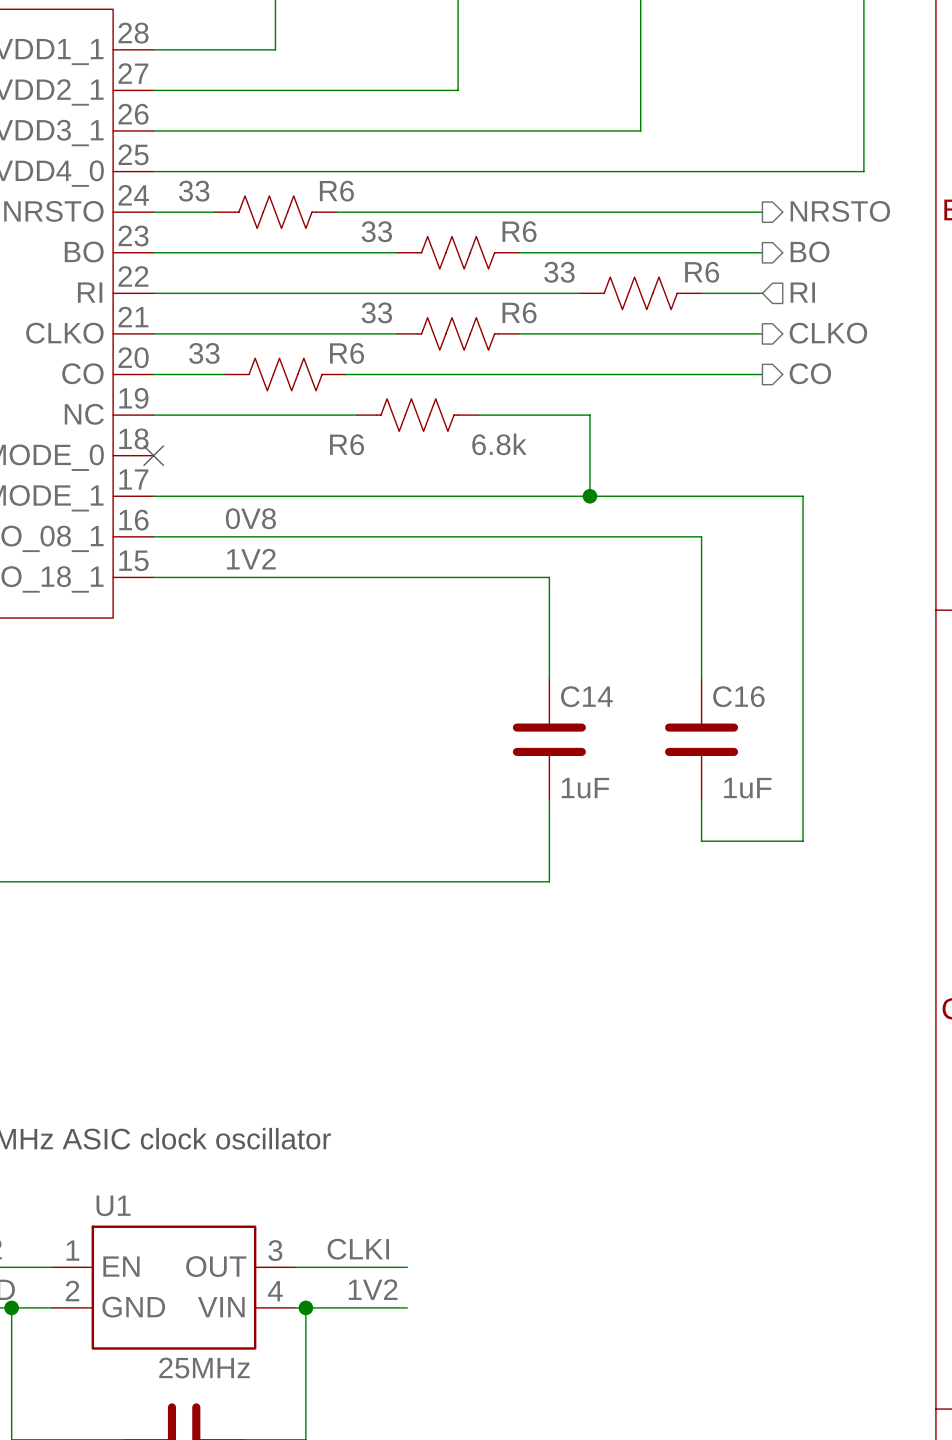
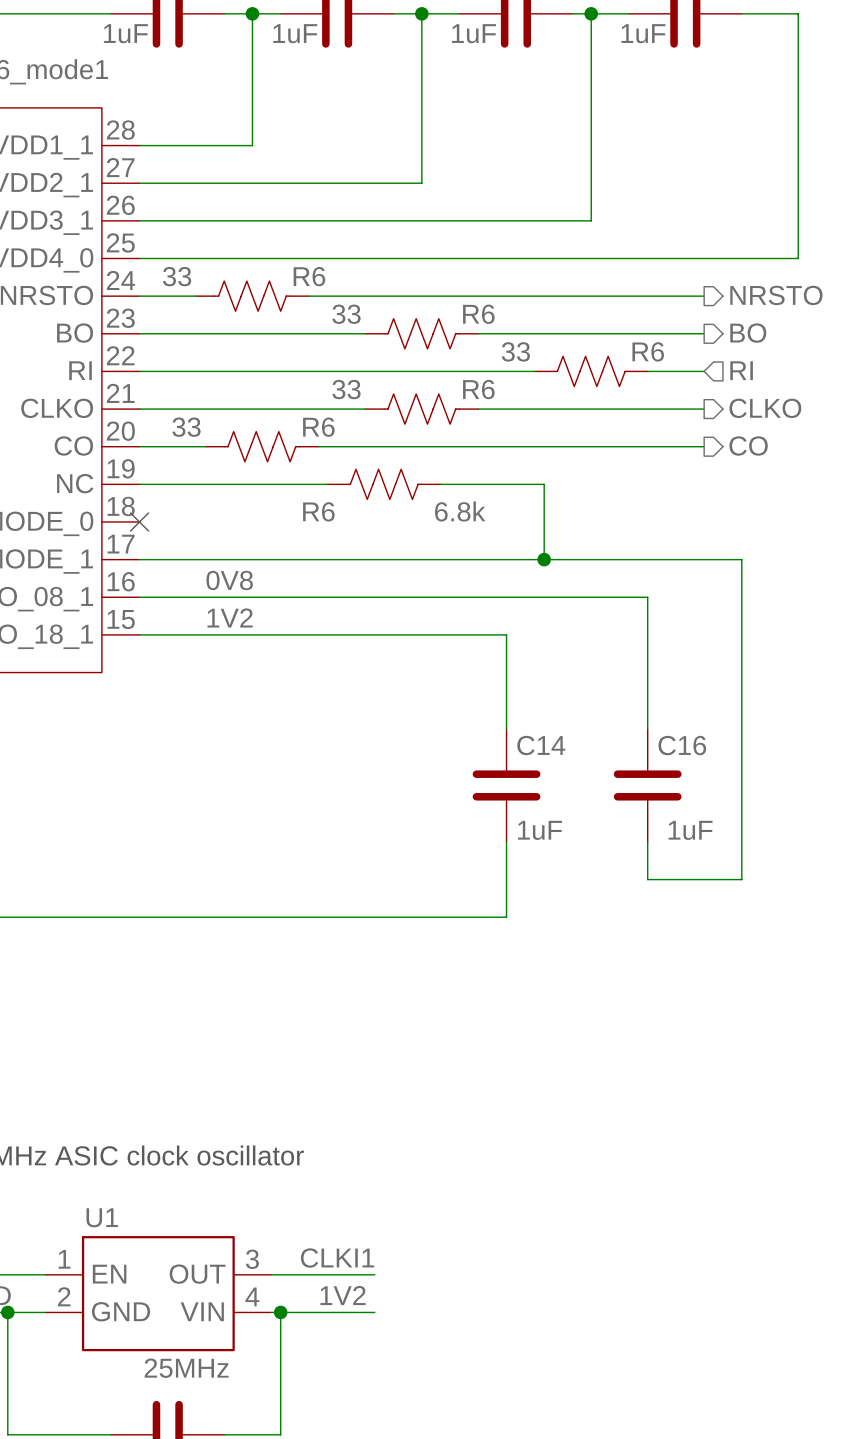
label: CLKI (358, 1249) -> CLKI1 (337, 1258)

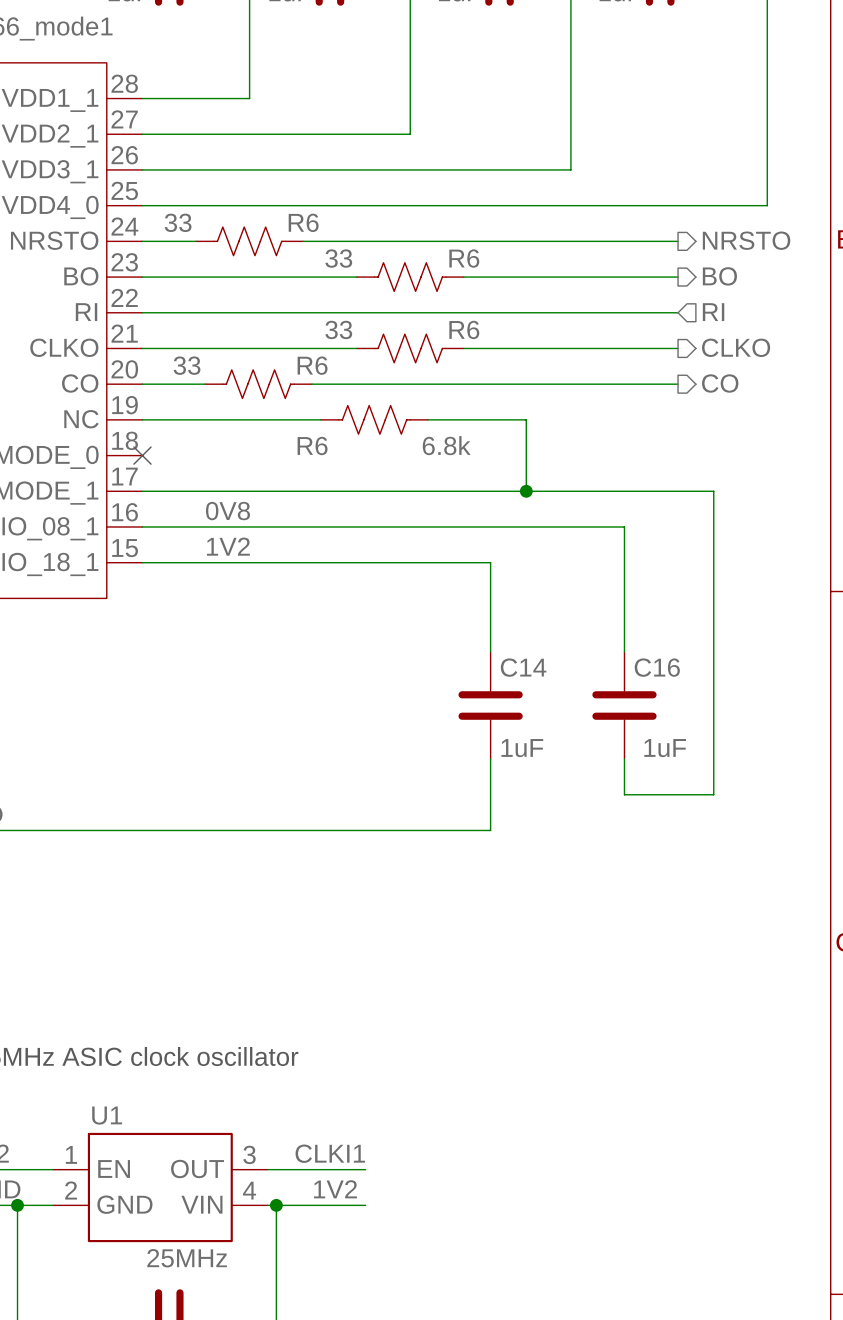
wire: none -> (517, 312) (624, 312)
R6: 33 (591, 371) -> none

